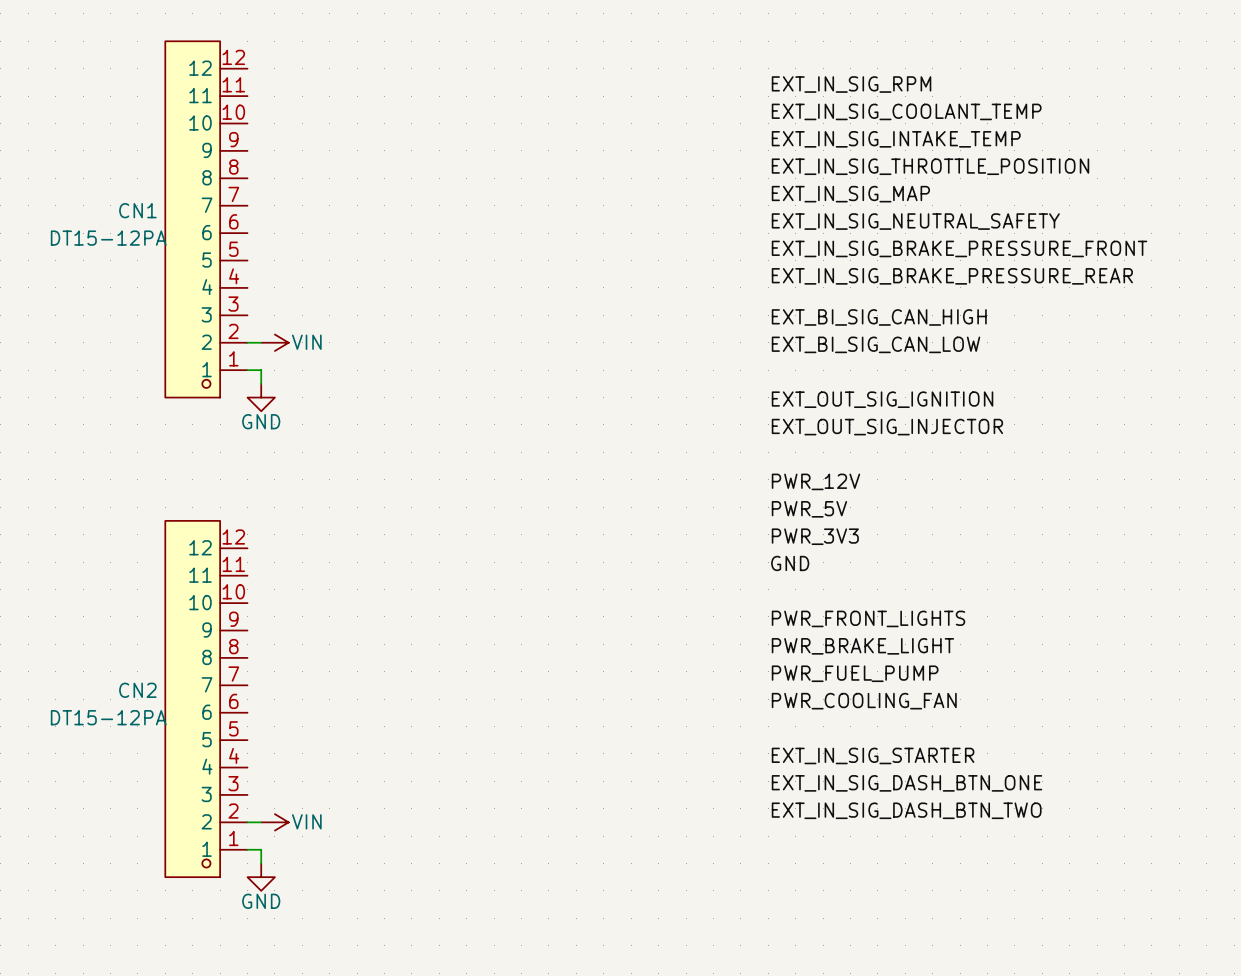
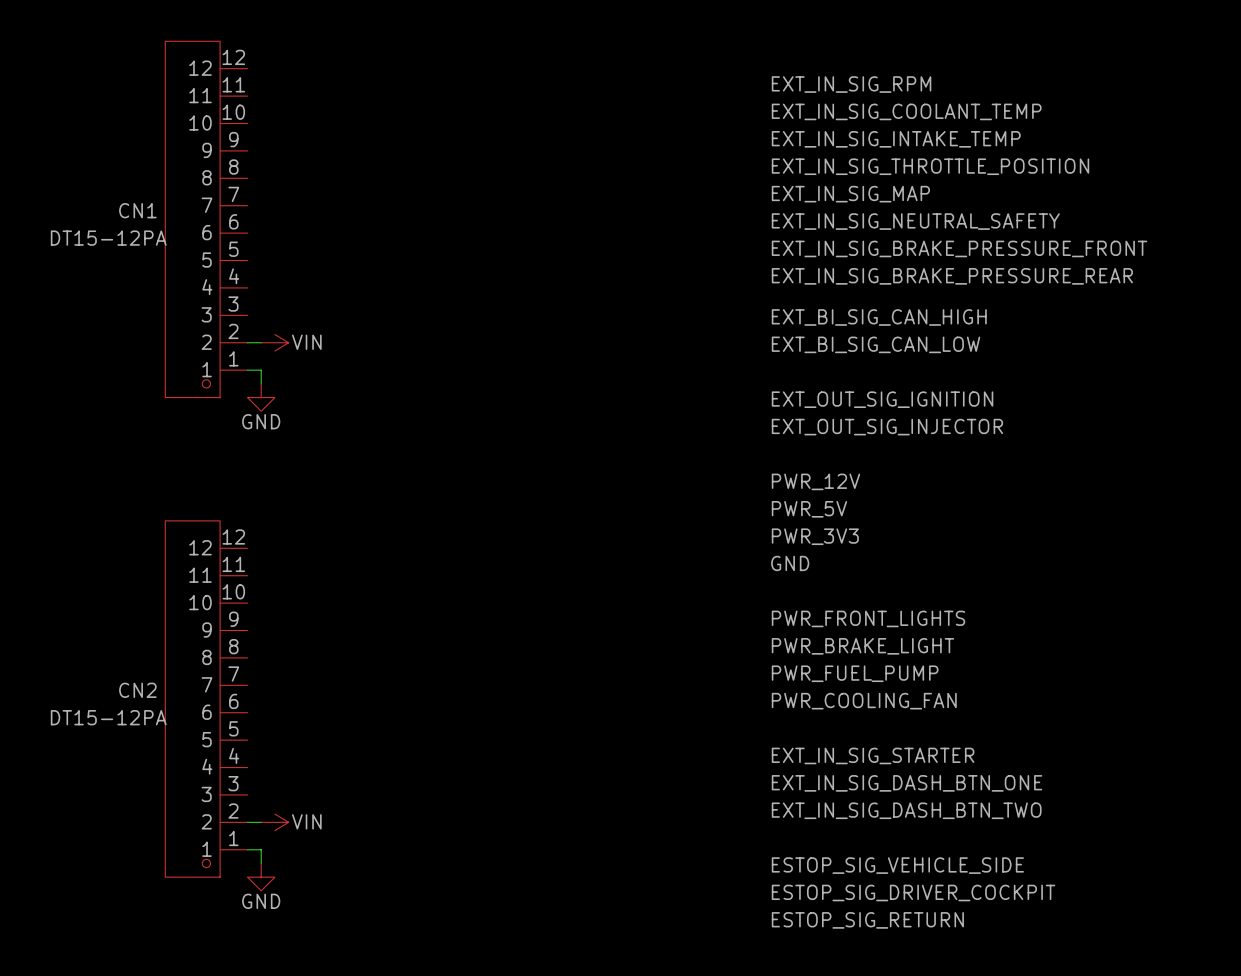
label: none -> ESTOP_SIG_VEHICLE_SIDE (897, 865)
label: none -> ESTOP_SIG_DRIVER_COCKPIT (913, 893)
label: none -> ESTOP_SIG_RETURN (867, 920)

